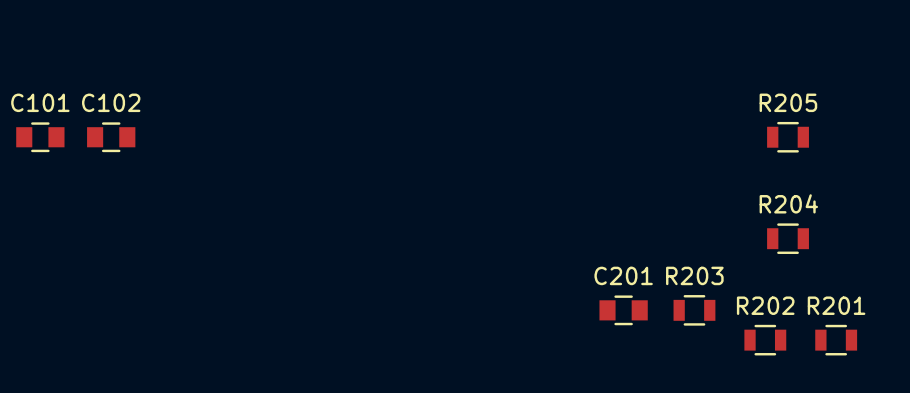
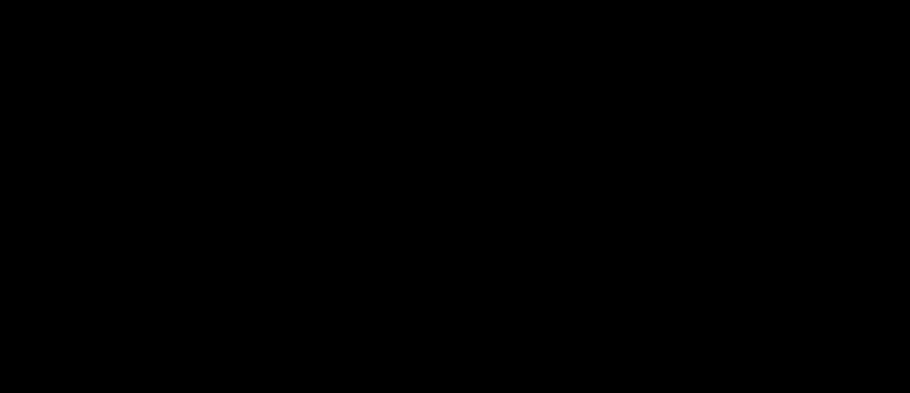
C101: (40, 137) -> none
C102: (111, 137) -> none
R205: (788, 137) -> none
R204: (788, 238) -> none
C201: (623, 310) -> none
R203: (694, 310) -> none
R202: (765, 340) -> none
R201: (836, 340) -> none

